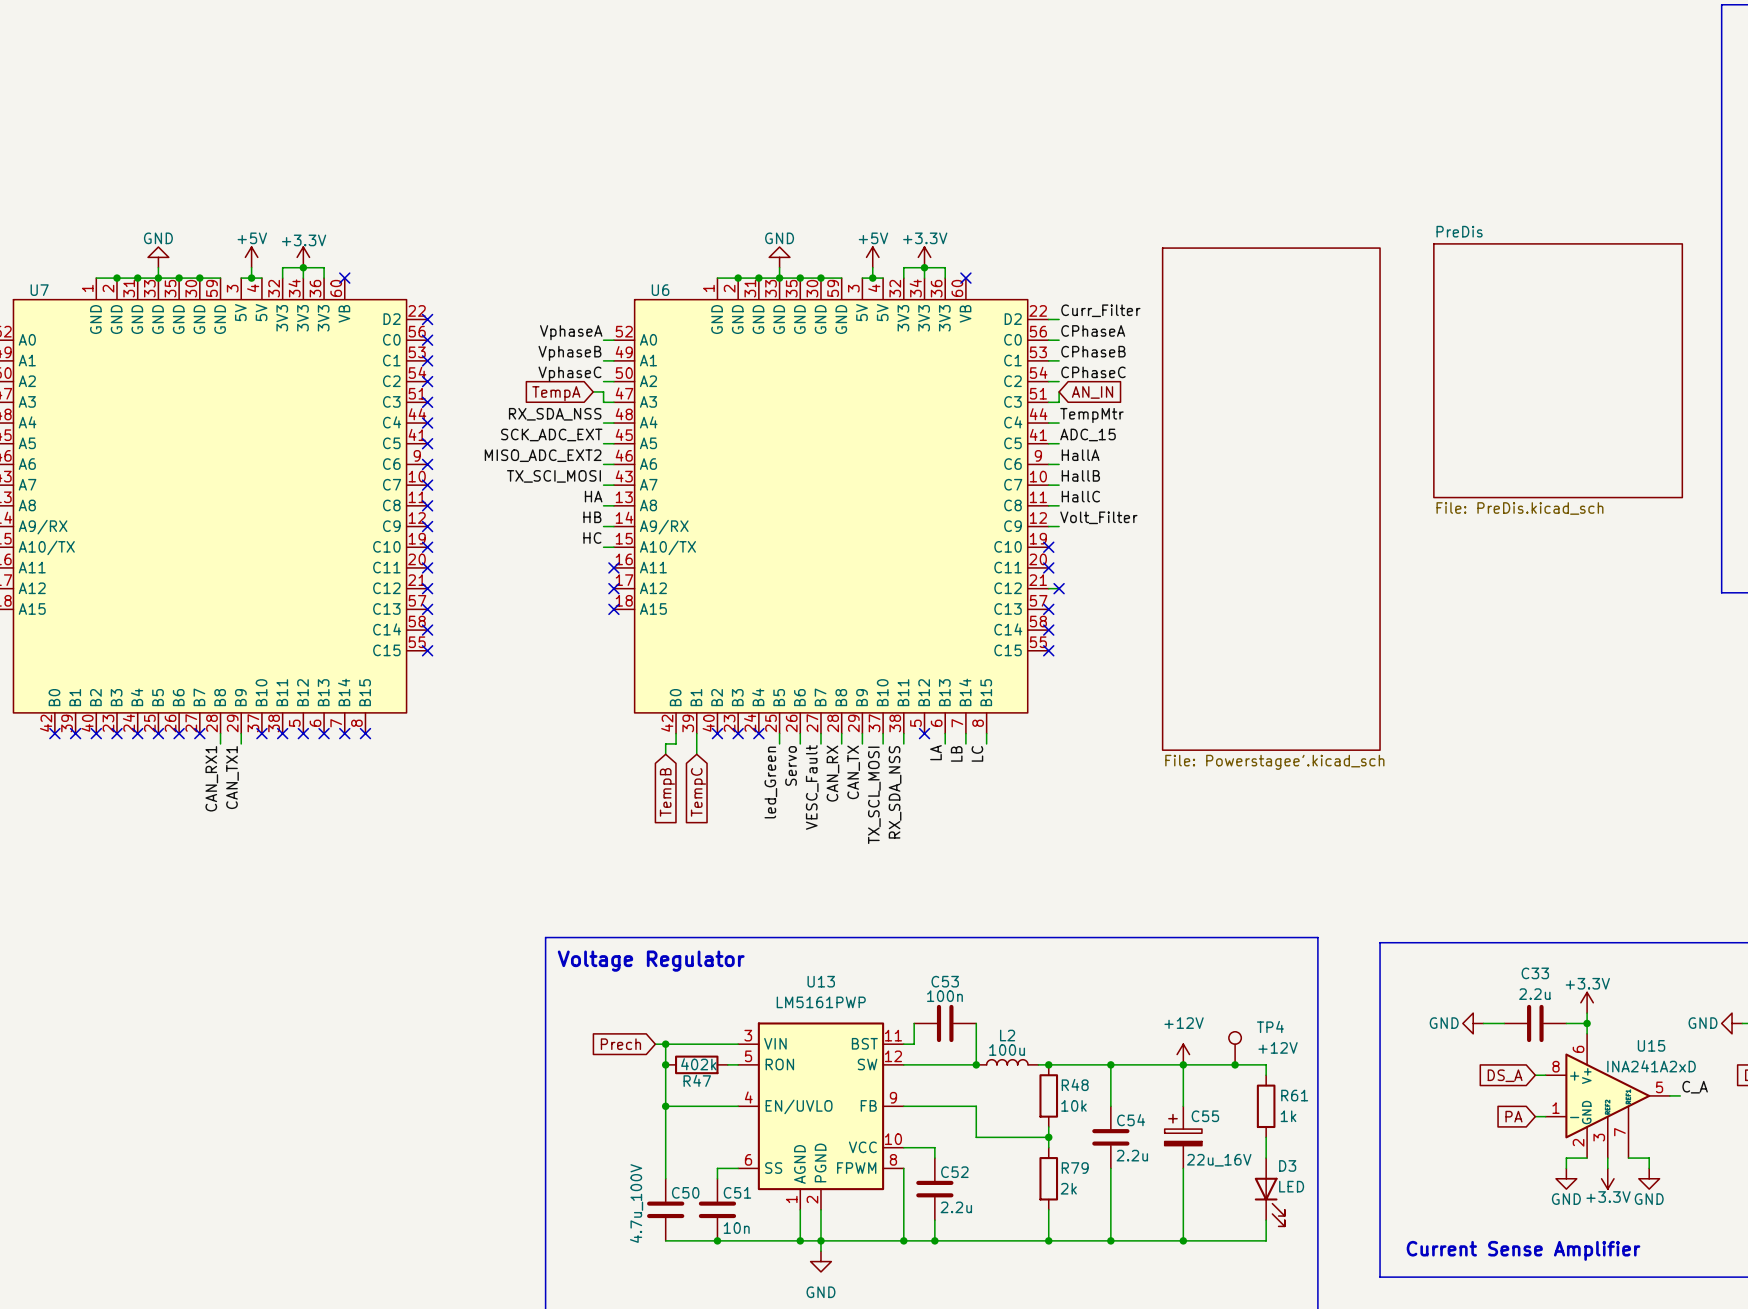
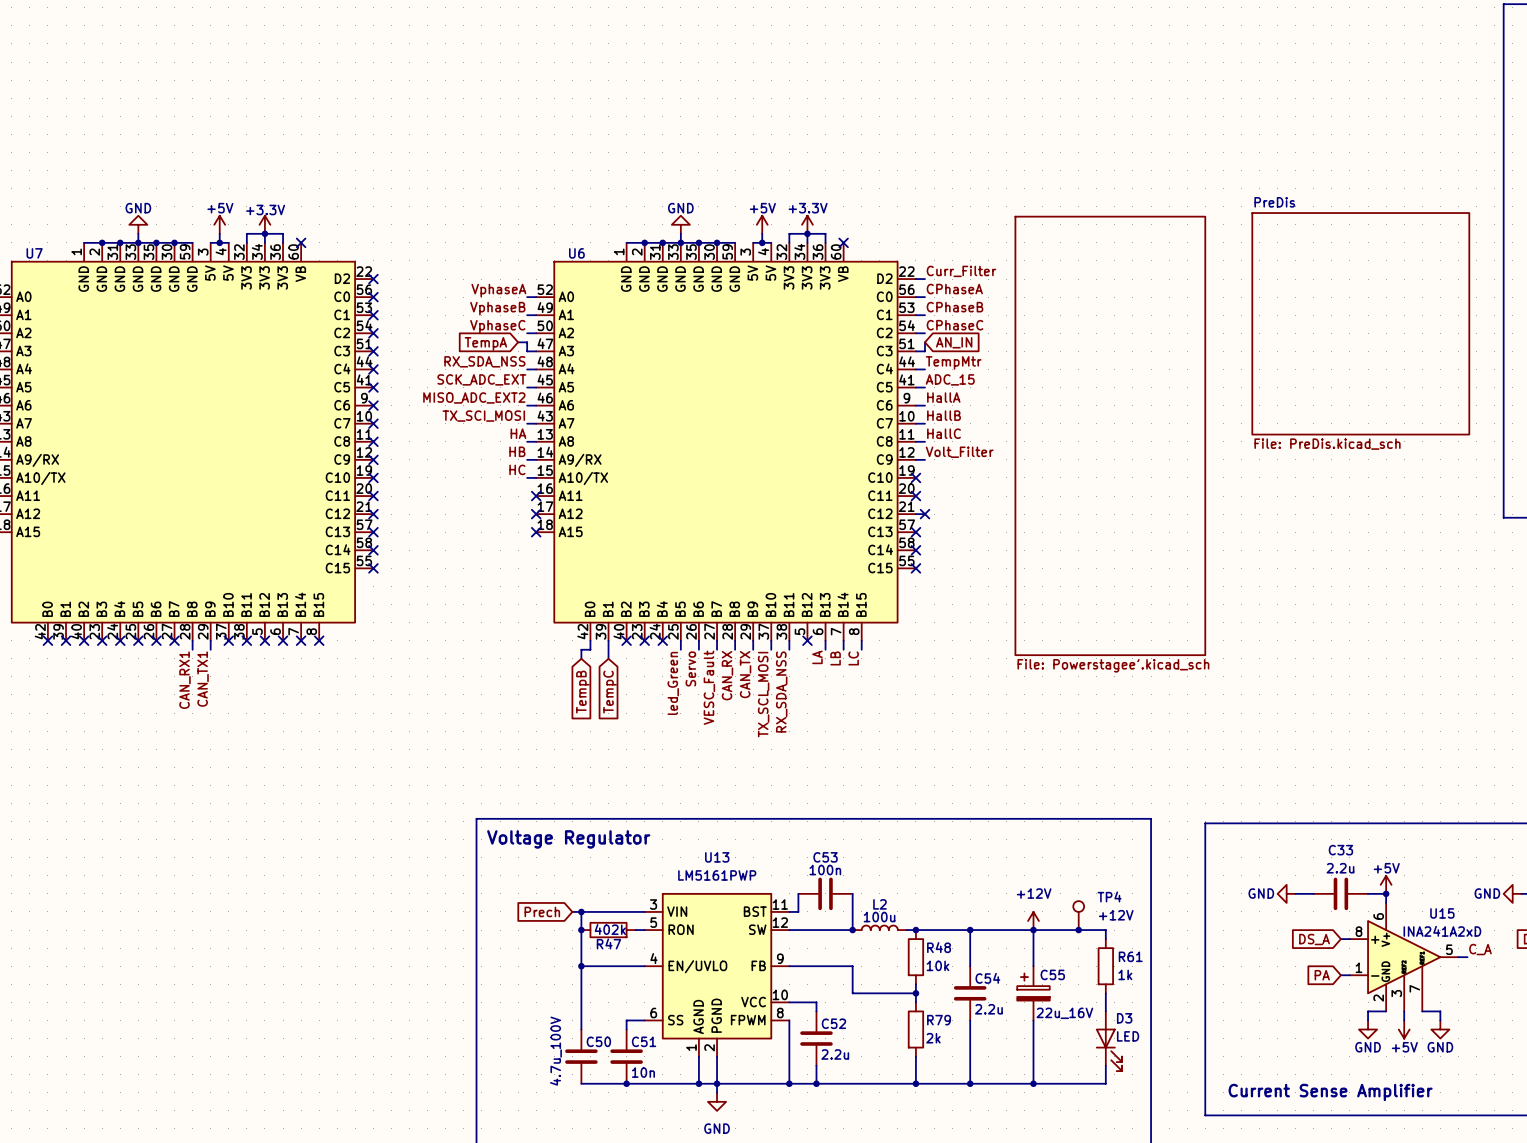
power symbol: +3.3V (1587, 1002) -> none
power symbol: none -> +5V (1386, 884)
power symbol: +3.3V (1607, 1178) -> +5V (1404, 1029)

